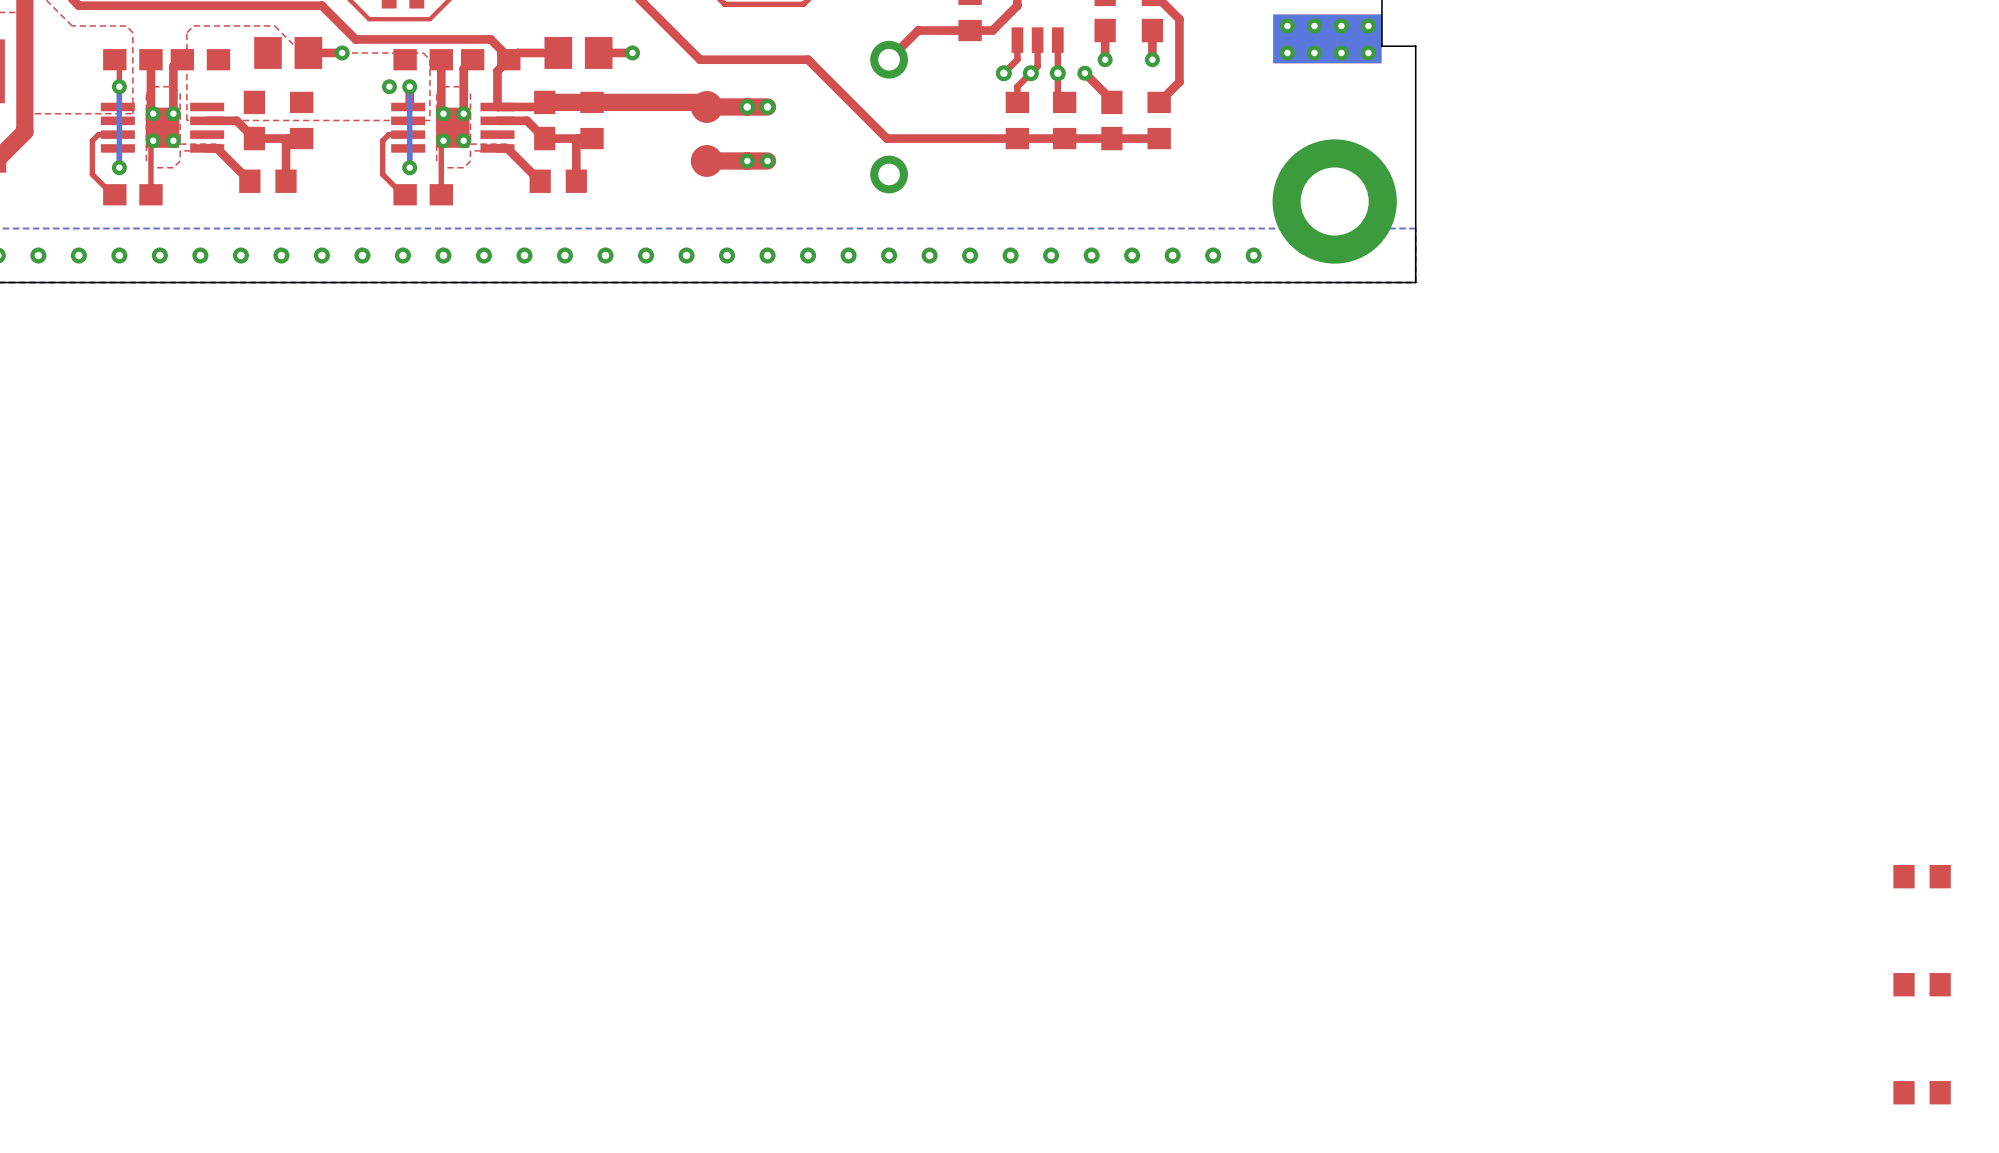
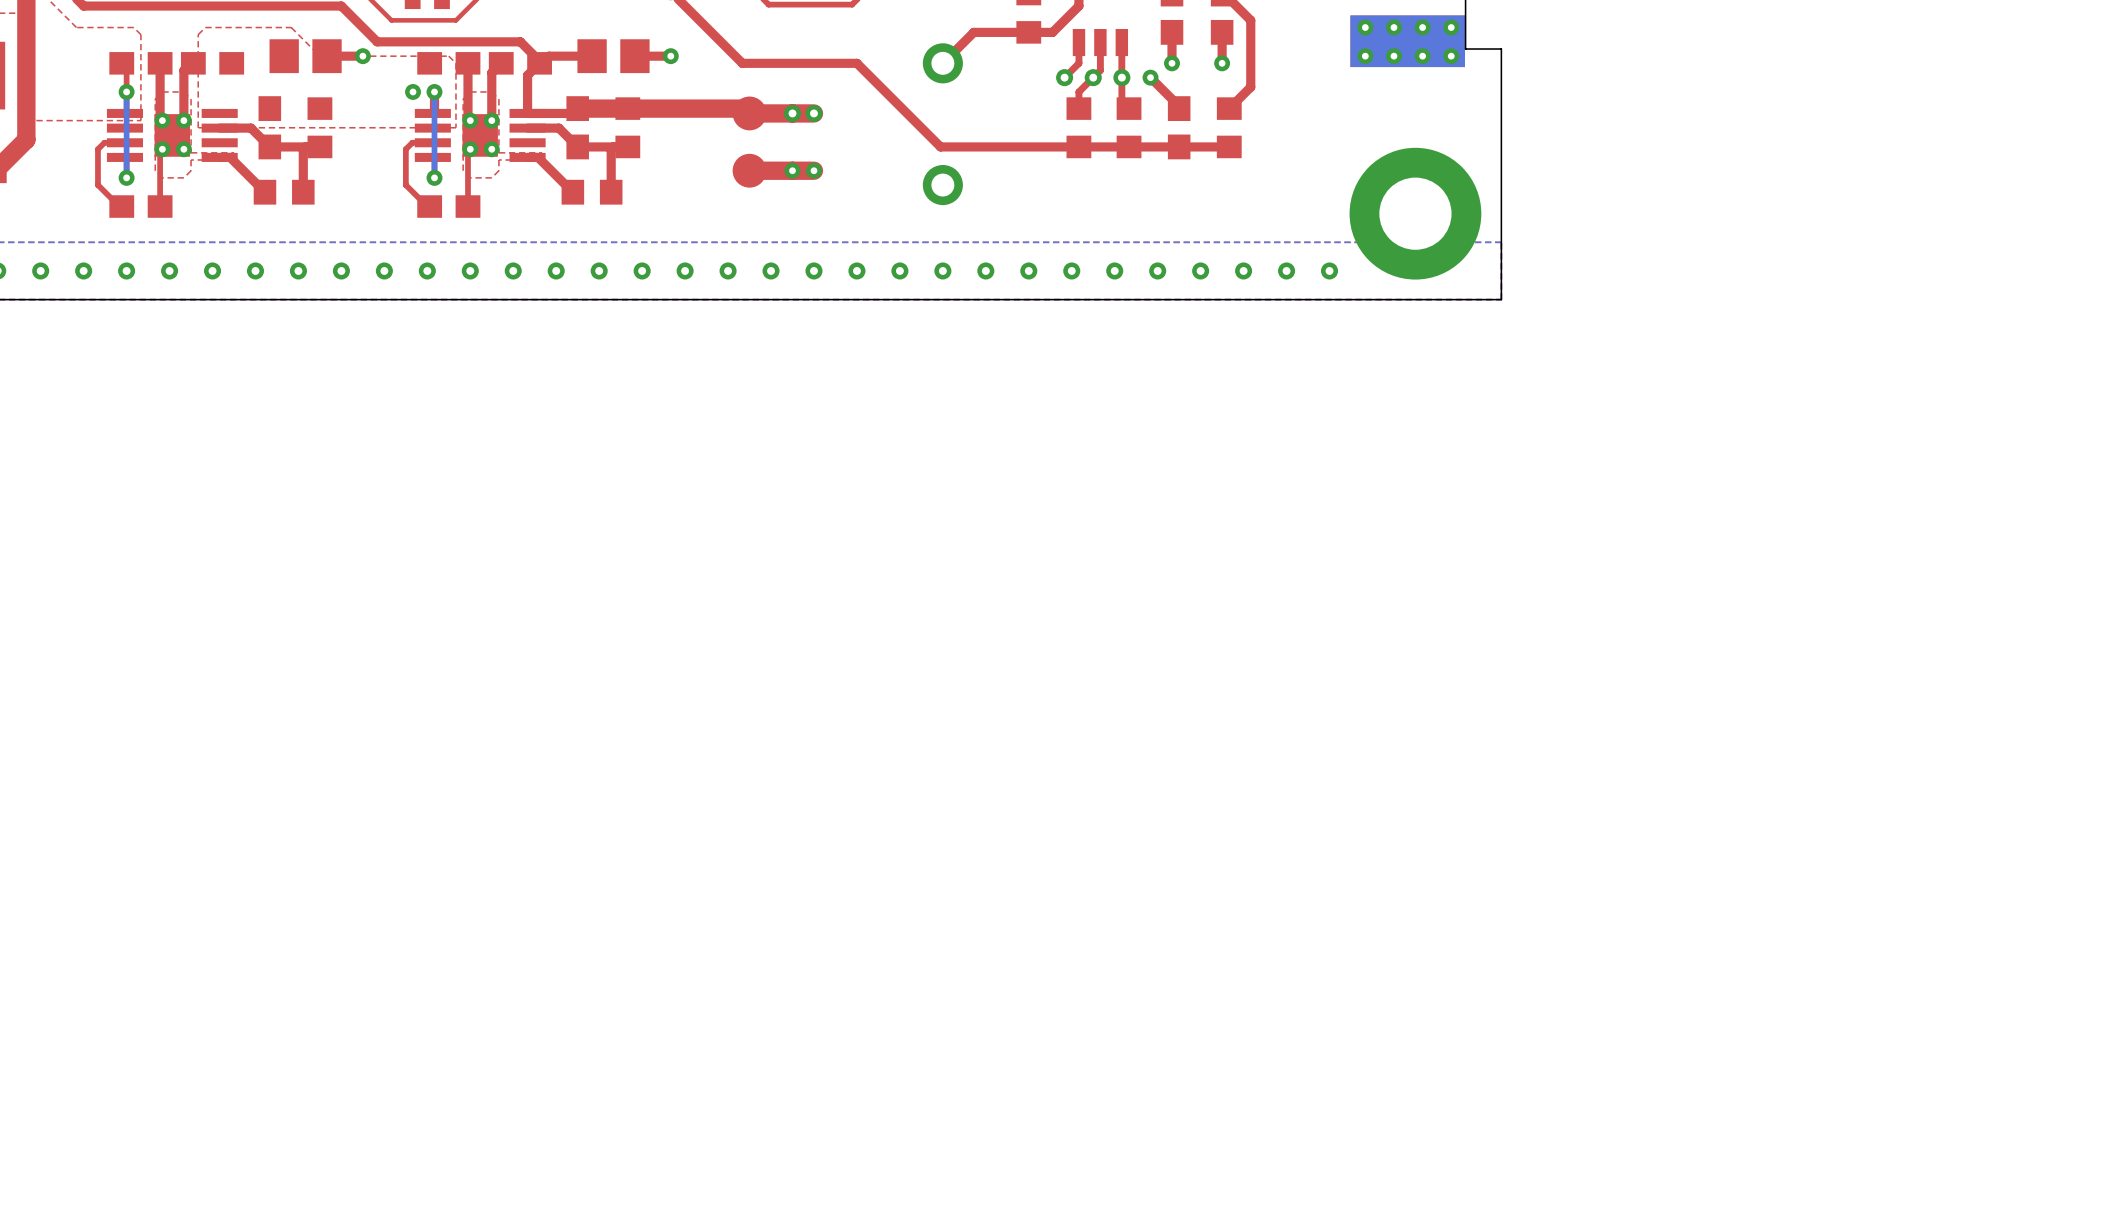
part: (1922, 876) -> none
part: (1922, 984) -> none
part: (1922, 1092) -> none

